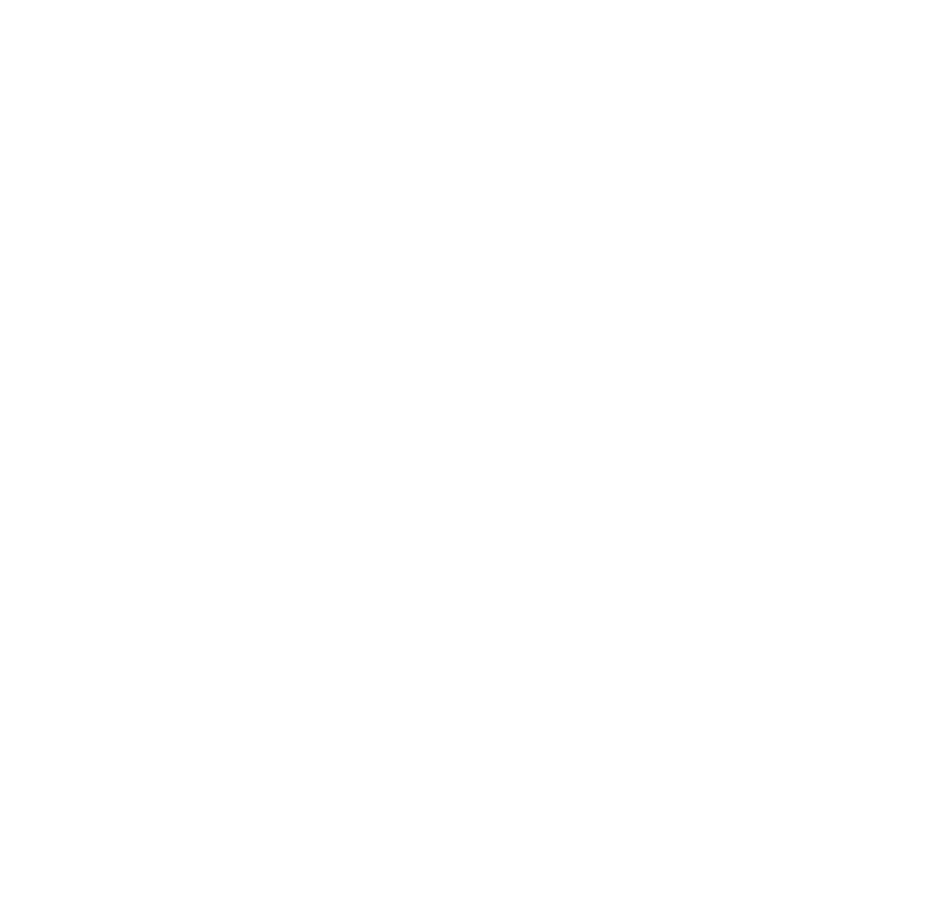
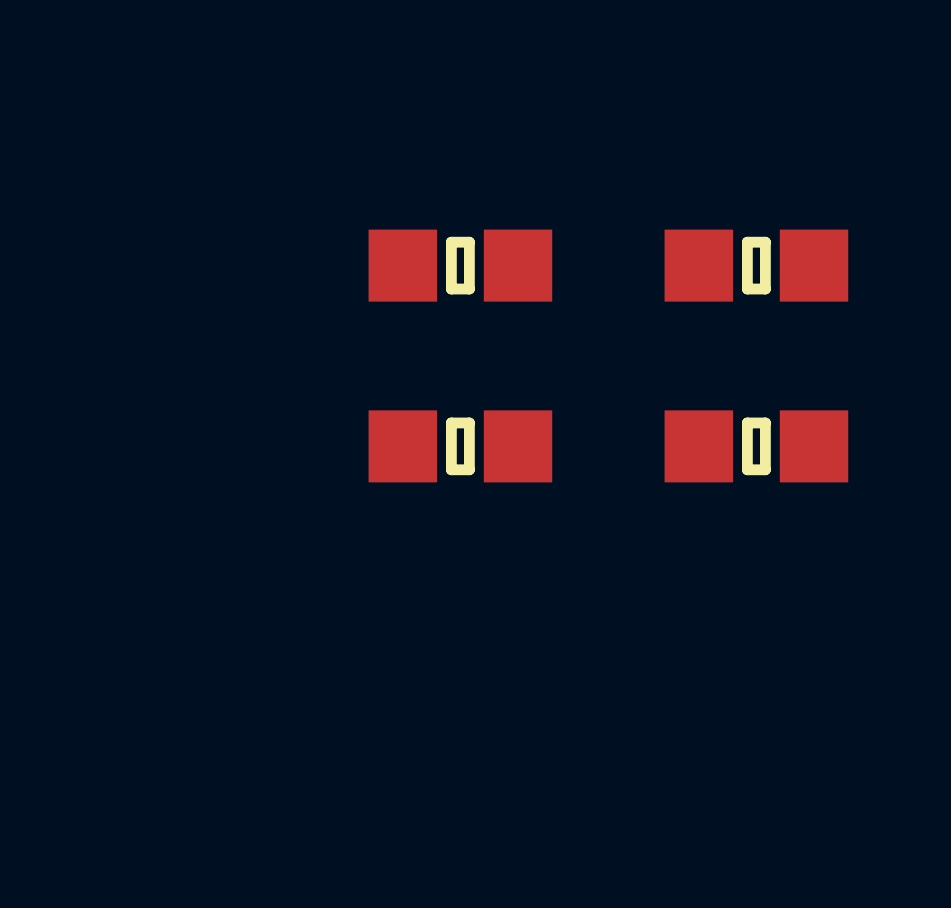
part: none -> (460, 265)
part: none -> (756, 265)
part: none -> (460, 446)
part: none -> (756, 446)

